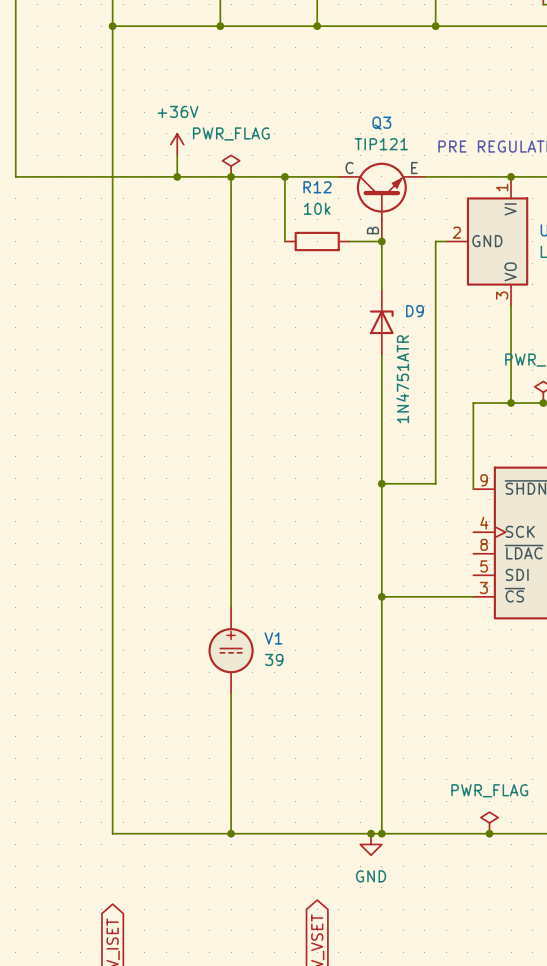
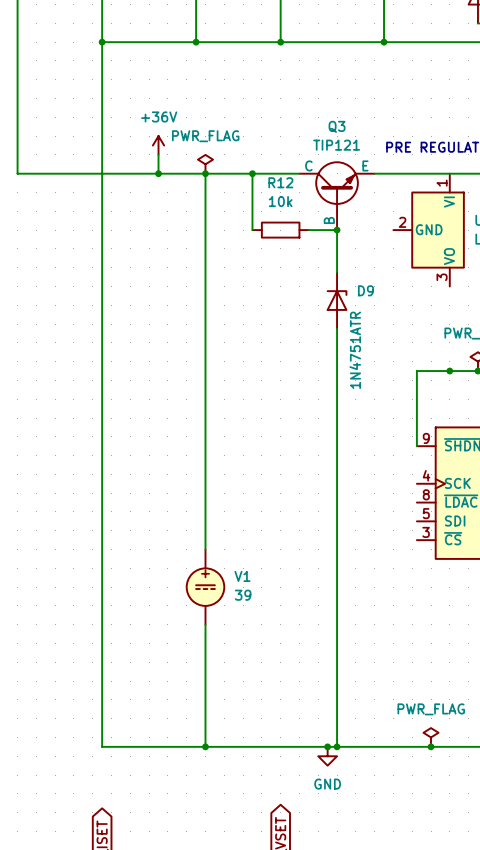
junction: (511, 176) -> none
wire: (446, 241) (435, 241) (435, 483) (381, 483) -> none
wire: (511, 306) (511, 403) -> none
junction: (381, 483) -> none
wire: (381, 596) (473, 596) -> none
junction: (381, 596) -> none

